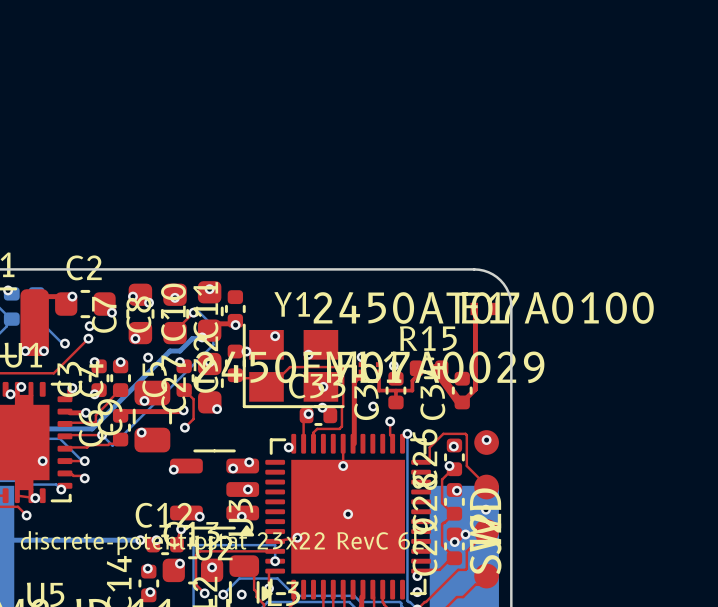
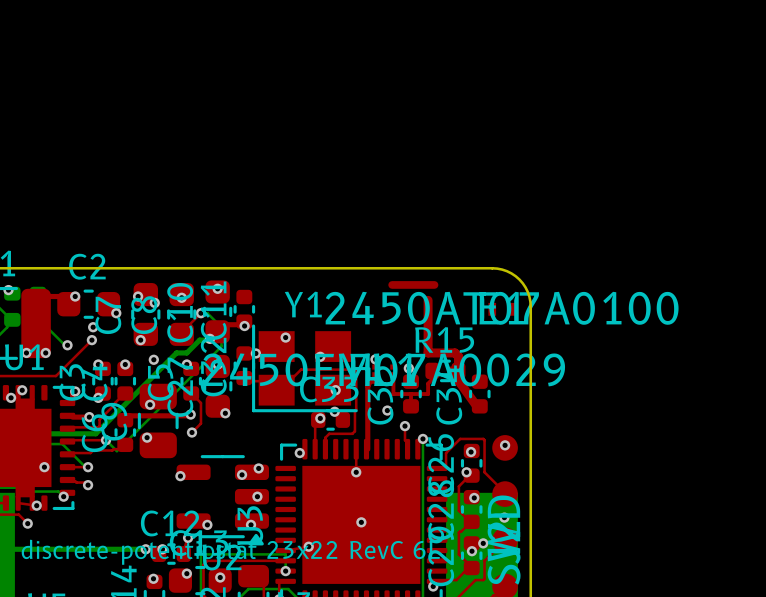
top track: none -> (392, 284) (434, 284)
top track: none -> (428, 300) (428, 352) (455, 352) (458, 356) (458, 368)
top track: (475, 308) (475, 389) (462, 402) -> none

